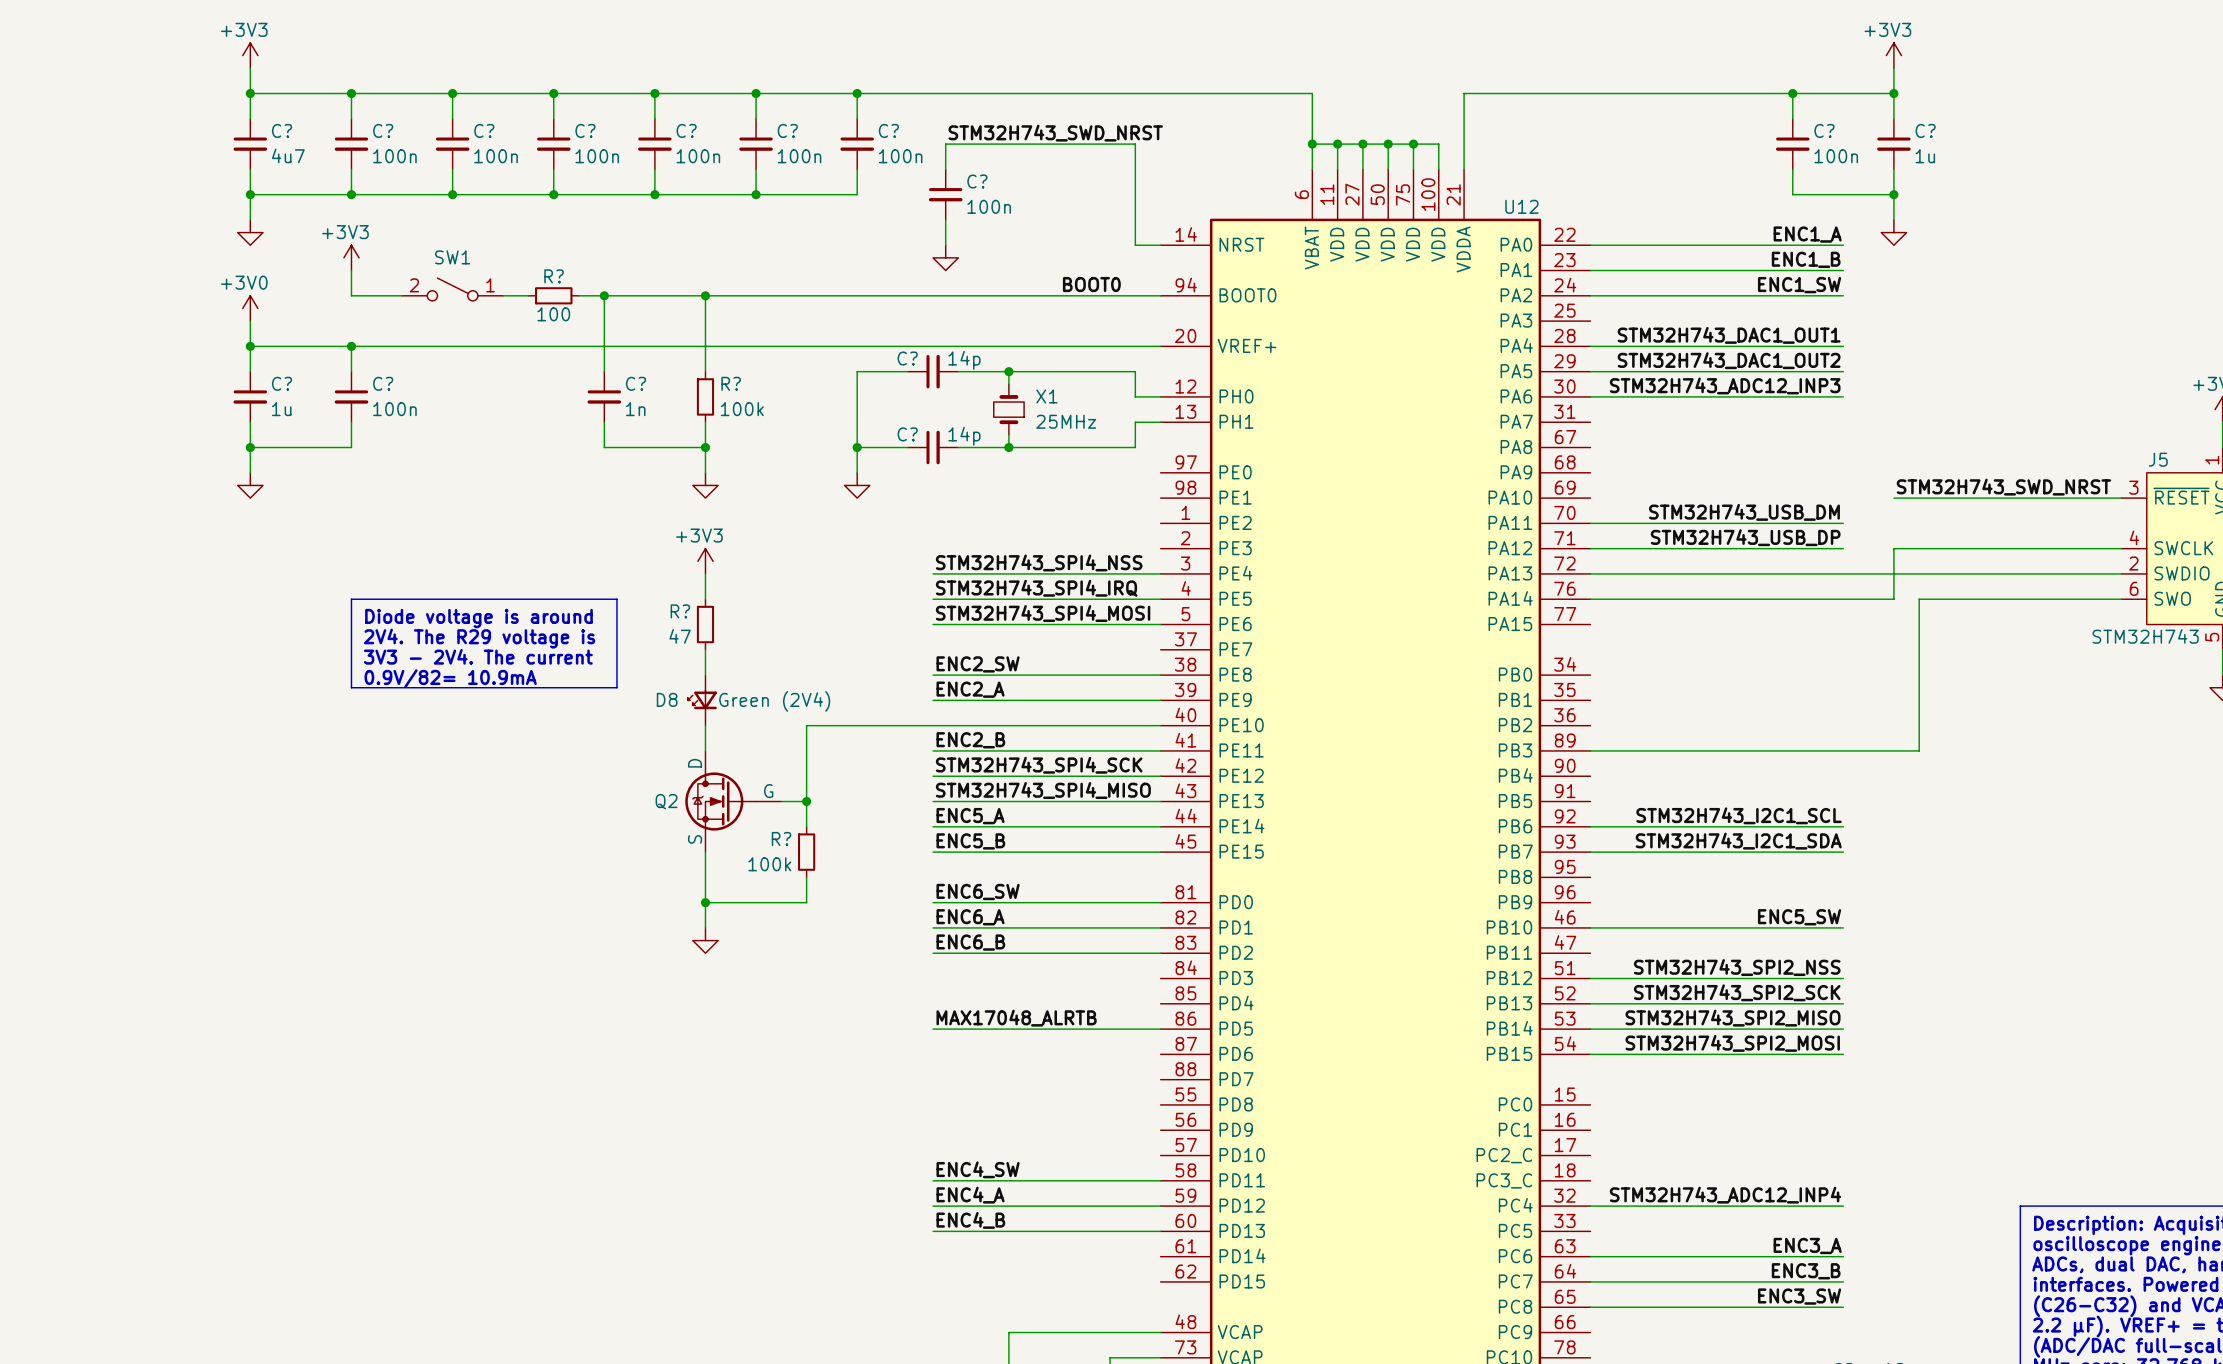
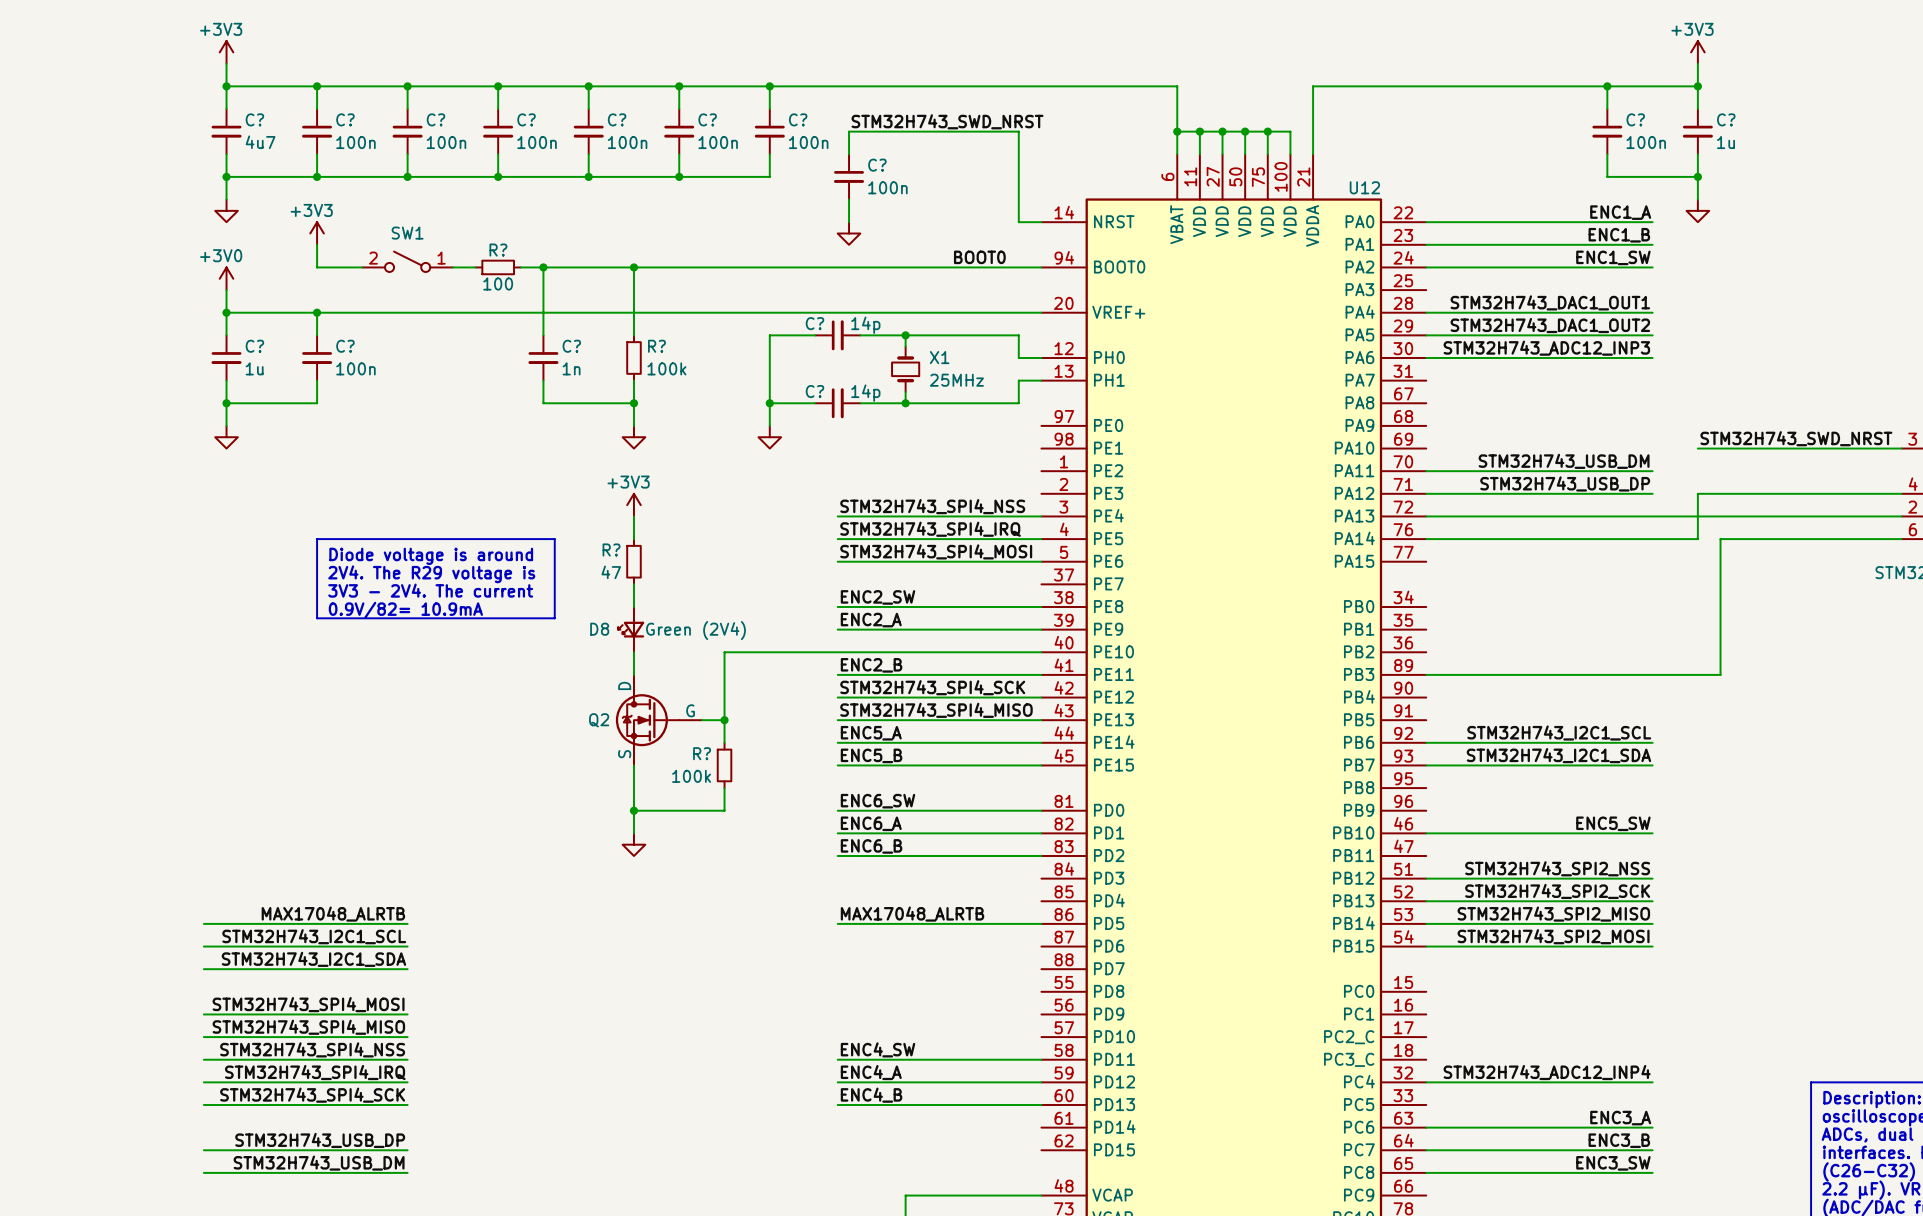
label: none -> MAX17048_ALRTB (333, 914)
wire: none -> (203, 923) (407, 923)
label: none -> STM32H743_I2C1_SCL (314, 936)
wire: none -> (203, 946) (407, 946)
label: none -> STM32H743_I2C1_SDA (313, 959)
wire: none -> (203, 969) (407, 969)
label: none -> STM32H743_SPI4_MOSI (308, 1004)
wire: none -> (203, 1014) (407, 1014)
label: none -> STM32H743_SPI4_MISO (308, 1027)
wire: none -> (203, 1037) (407, 1037)
label: none -> STM32H743_SPI4_NSS (312, 1049)
wire: none -> (203, 1059) (407, 1059)
label: none -> STM32H743_SPI4_IRQ (315, 1072)
wire: none -> (203, 1082) (407, 1082)
label: none -> STM32H743_SPI4_SCK (312, 1095)
wire: none -> (203, 1104) (407, 1104)
label: none -> STM32H743_USB_DP (320, 1140)
wire: none -> (203, 1150) (407, 1150)
label: none -> STM32H743_USB_DM (319, 1163)
wire: none -> (203, 1172) (407, 1172)

